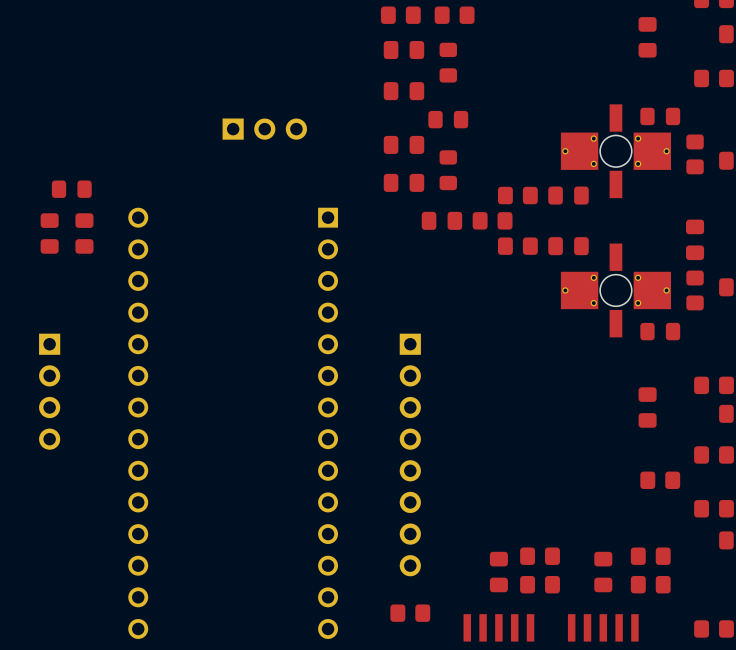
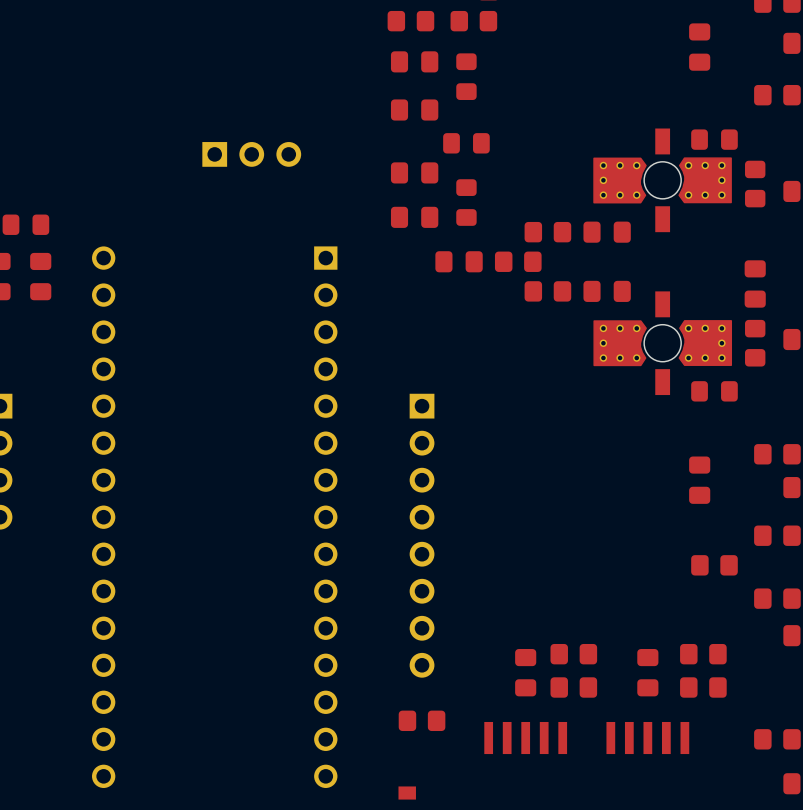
part footprint: [560, 104, 672, 199] -> [593, 128, 732, 233]
part footprint: [560, 243, 672, 338] -> [593, 291, 733, 396]

